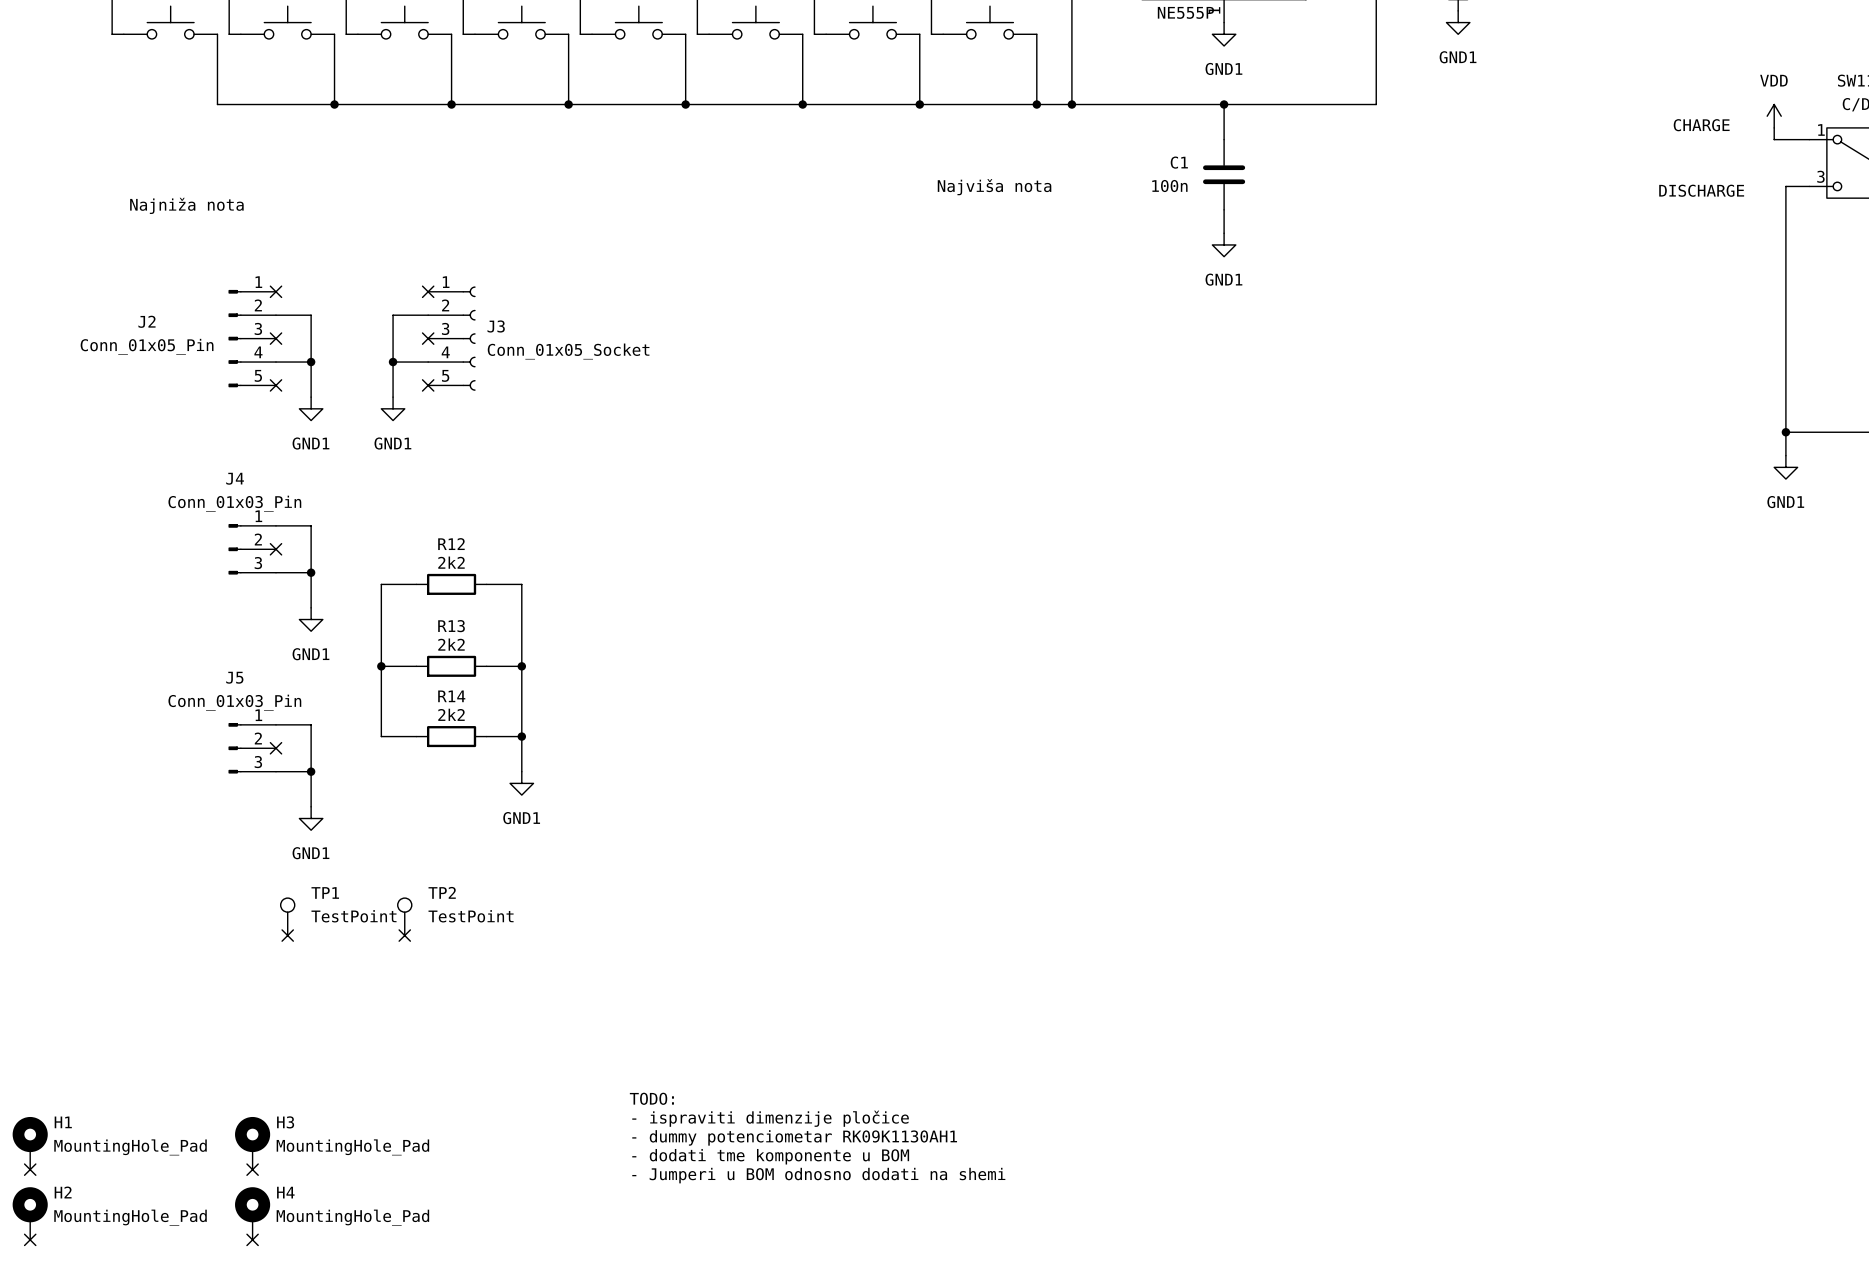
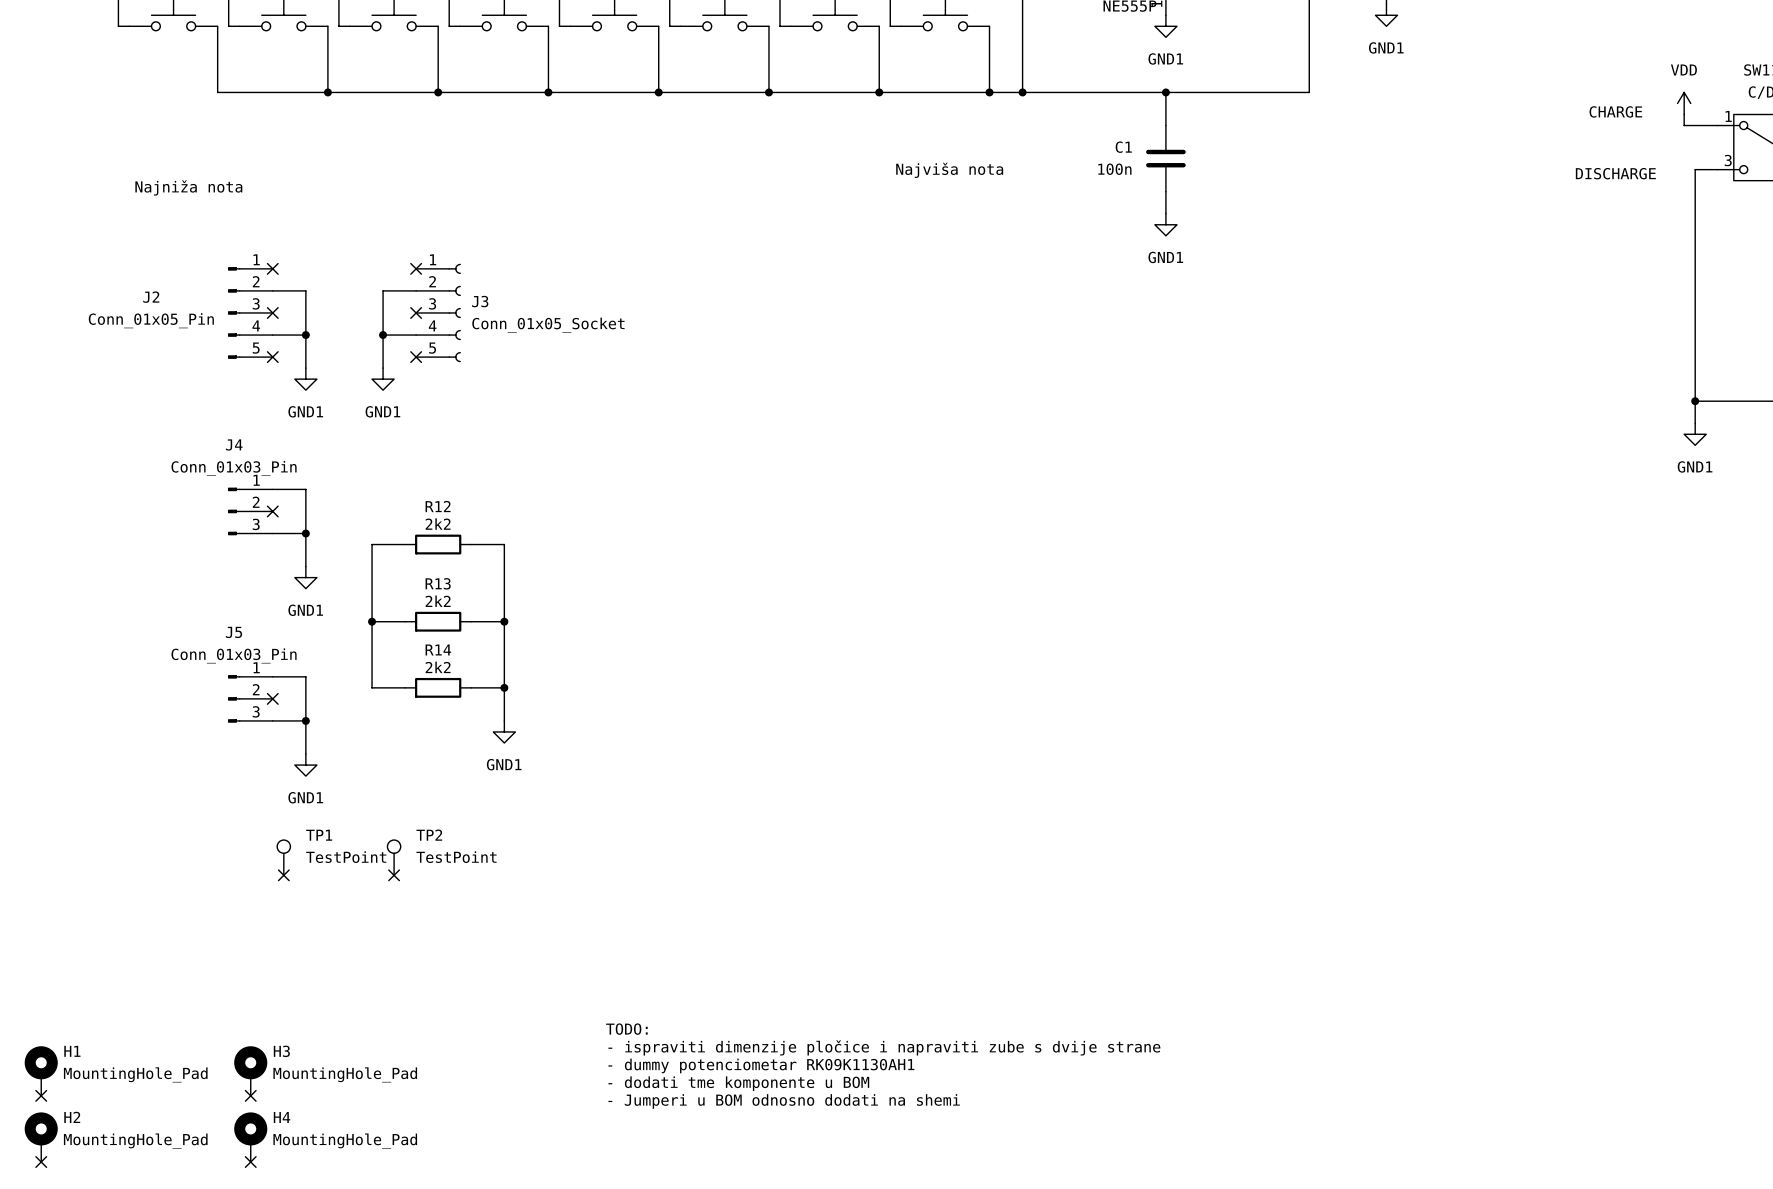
text: - ispraviti dimenzije pločice (770, 1118) -> - ispraviti dimenzije pločice i napraviti zube s dvije strane (884, 1047)

